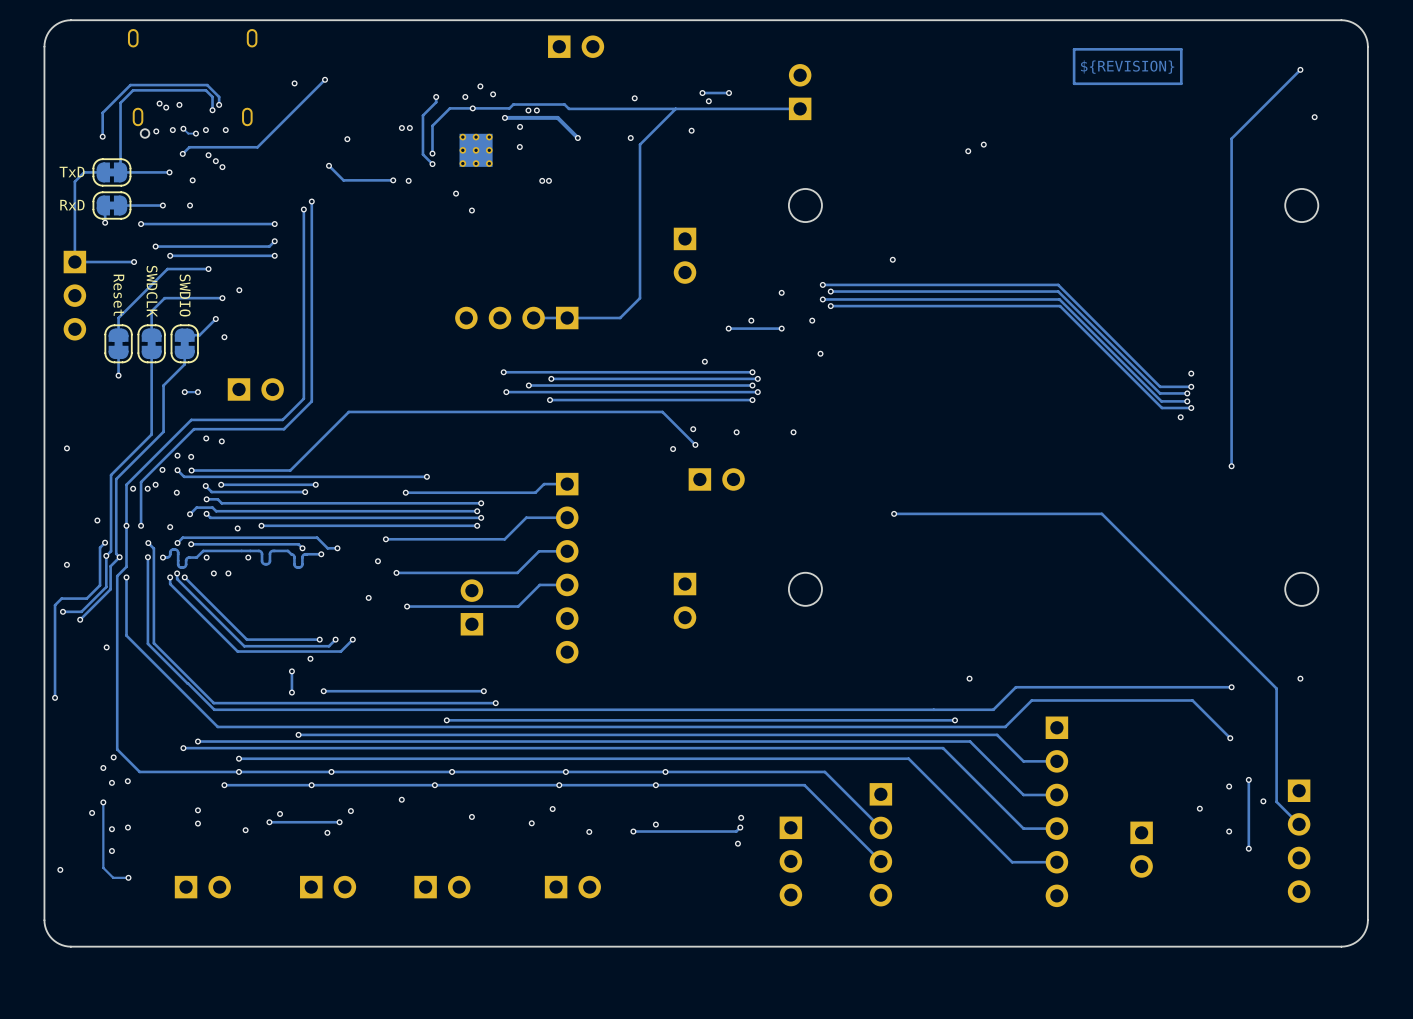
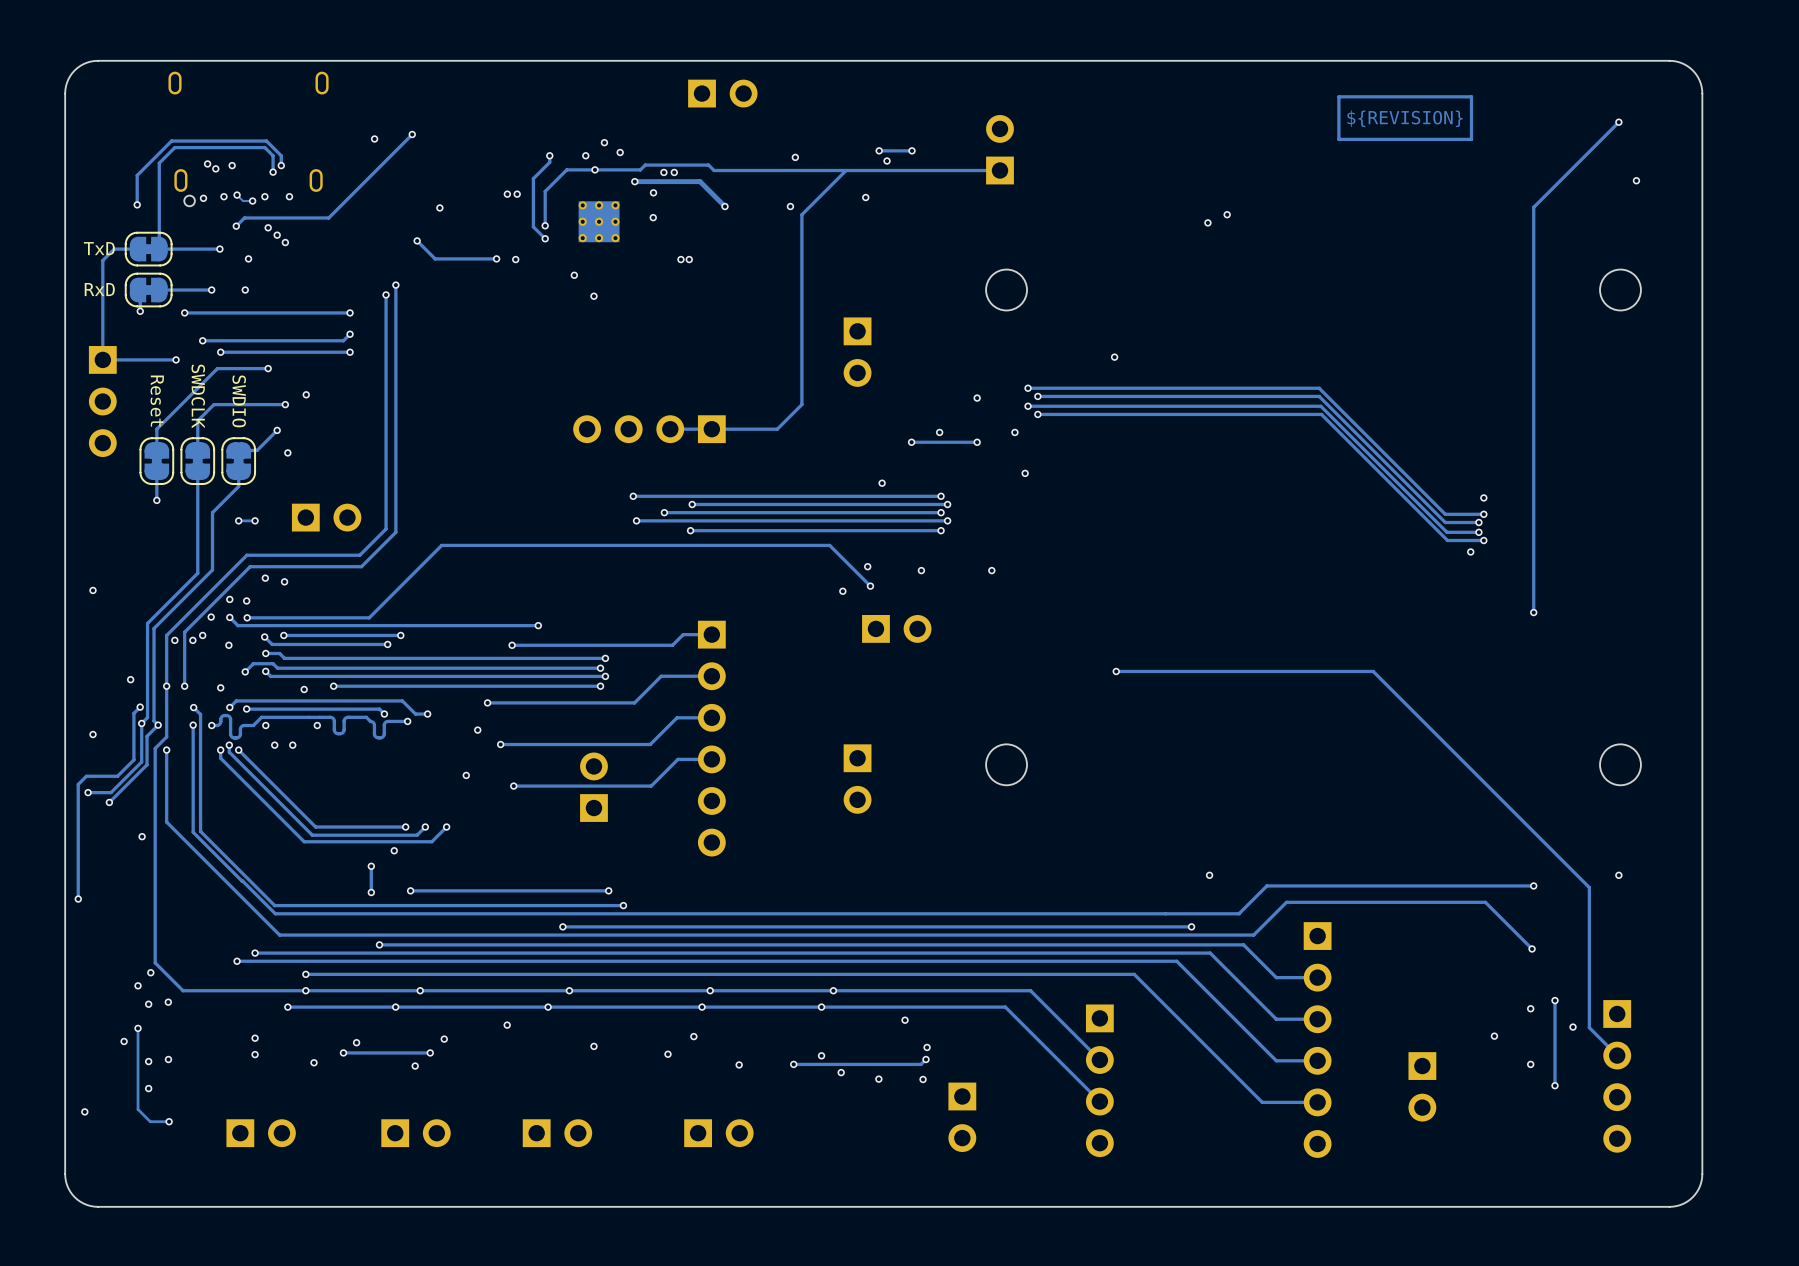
via: none -> (905, 1020)
via: none -> (841, 1072)
via: none -> (878, 1079)
part: (790, 861) -> none
part: none -> (962, 1117)

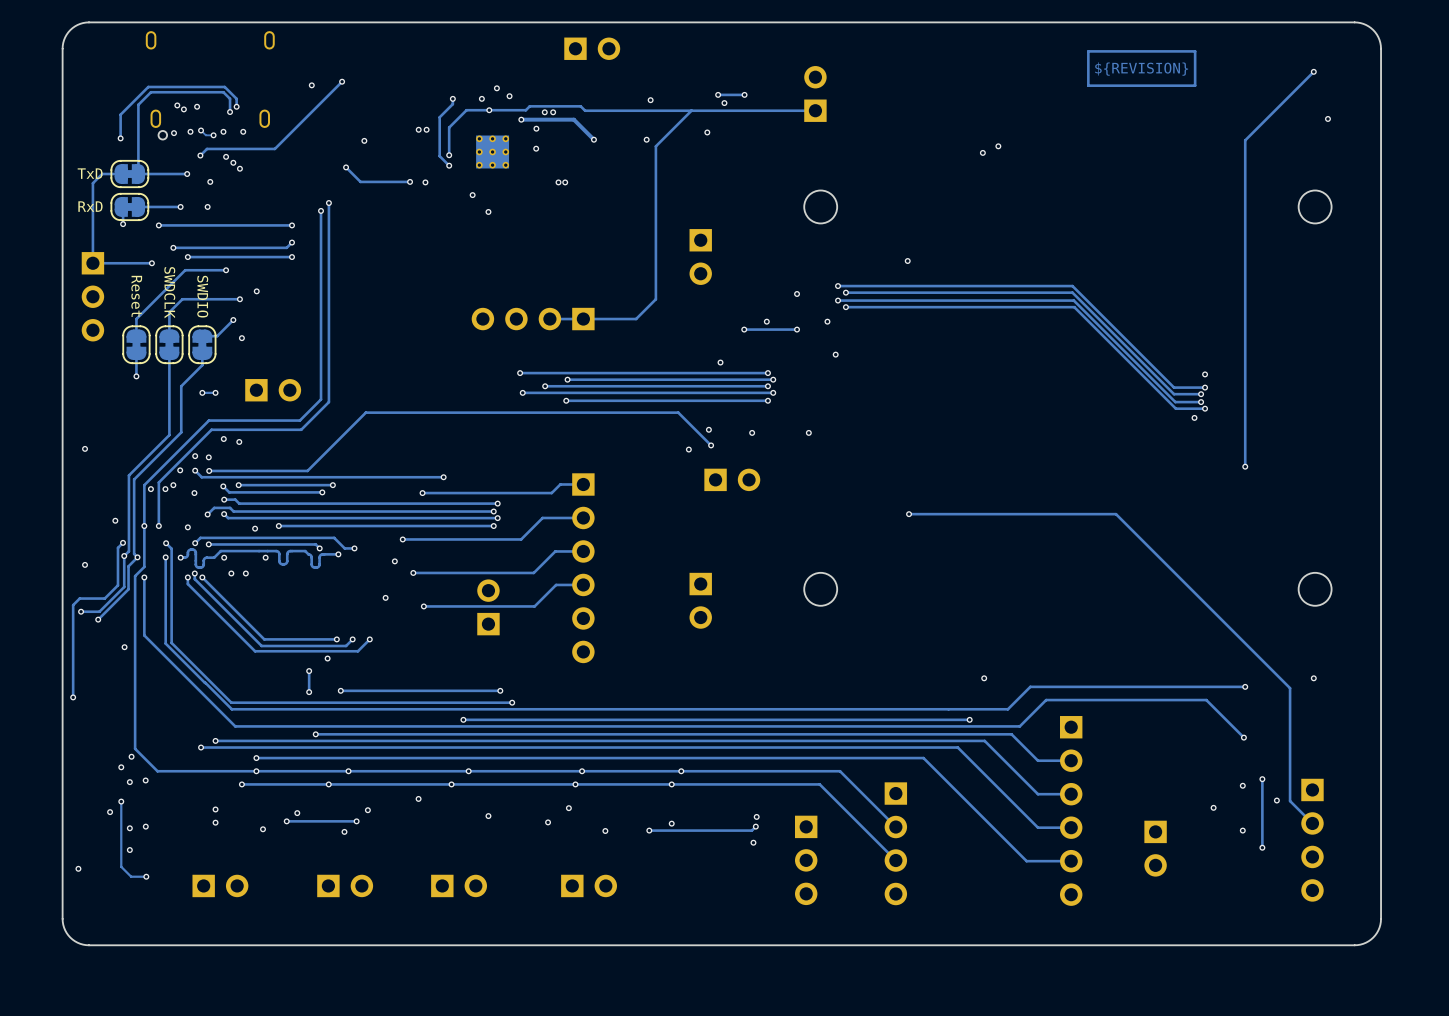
via: (905, 1020) -> none
via: (841, 1072) -> none
via: (878, 1079) -> none
part: none -> (806, 860)
part: (962, 1117) -> none

